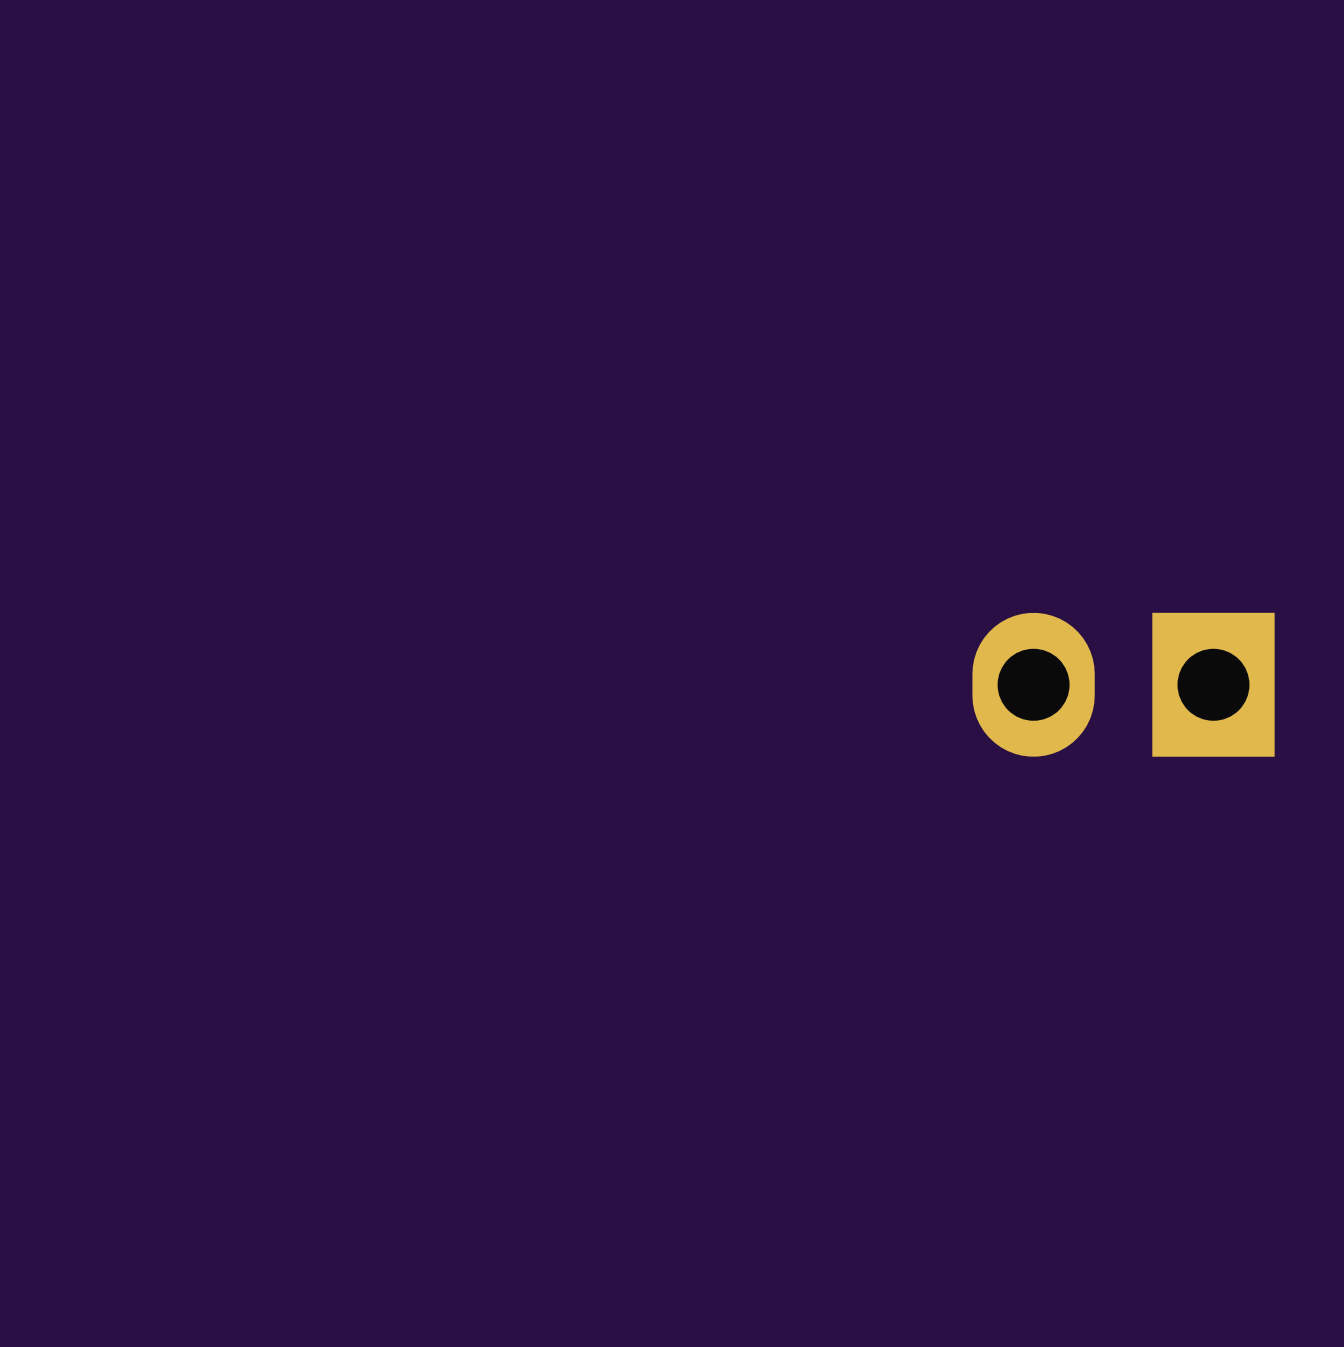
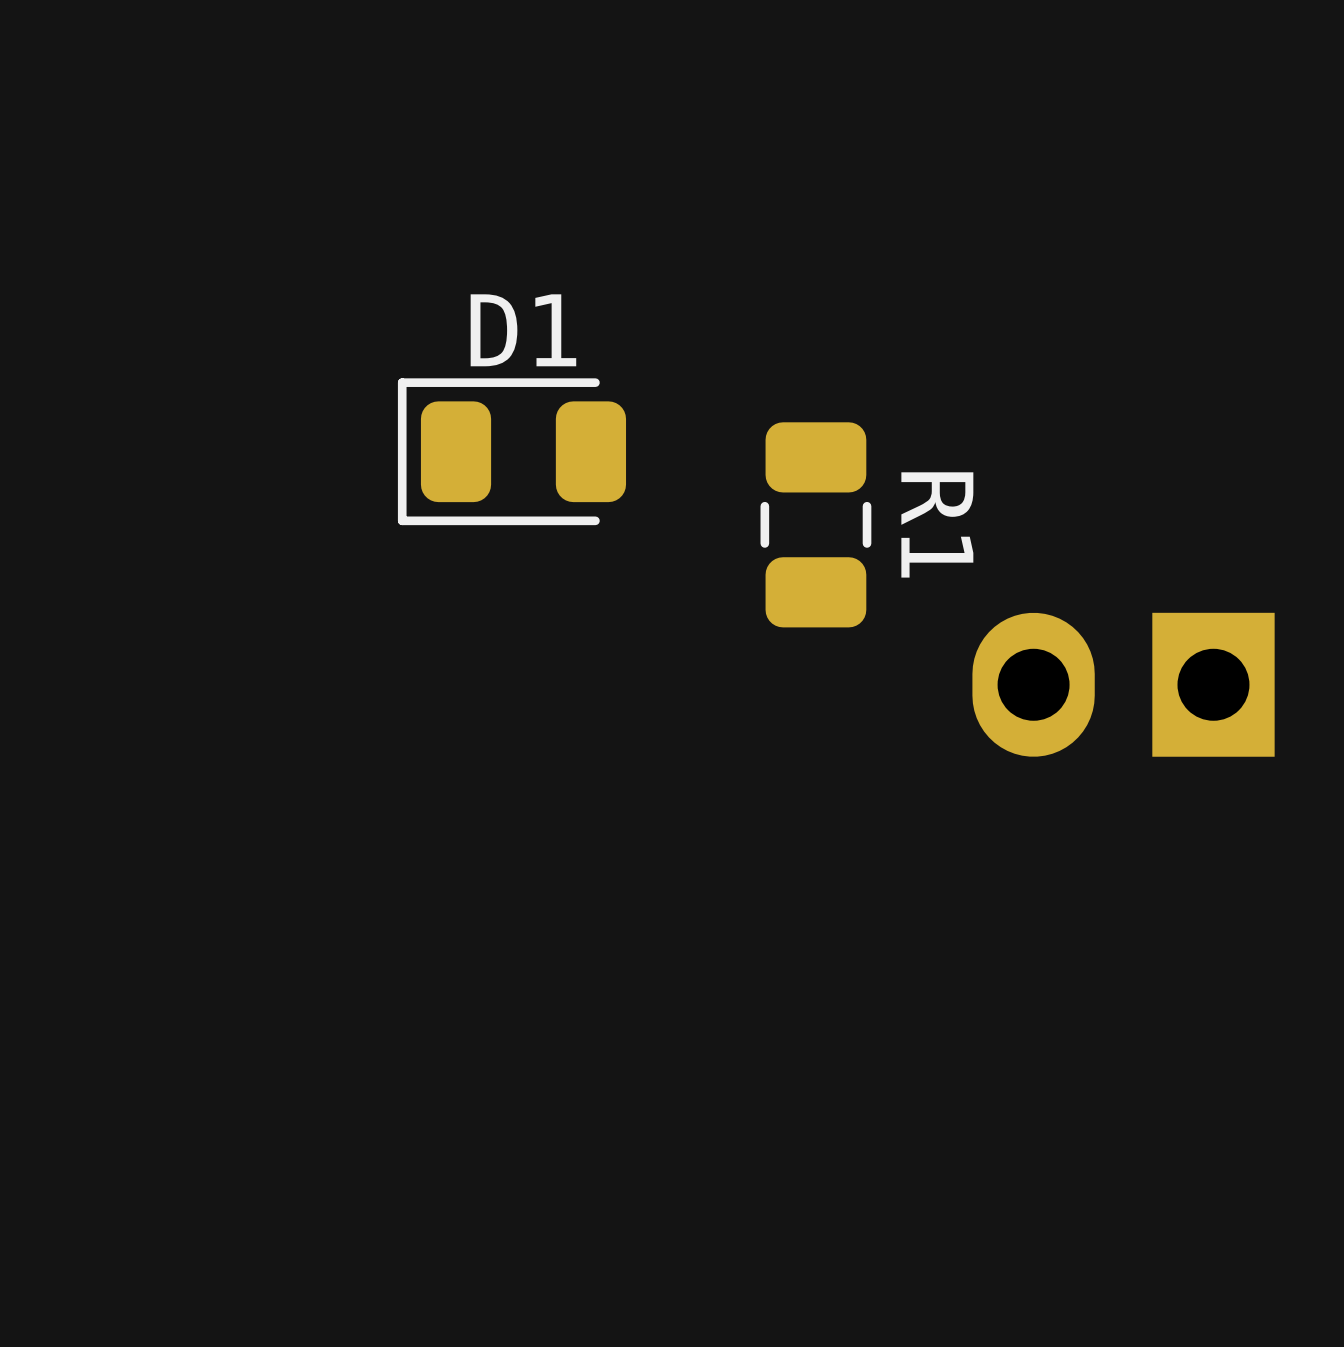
D1: none -> (511, 451)
R1: none -> (815, 524)

